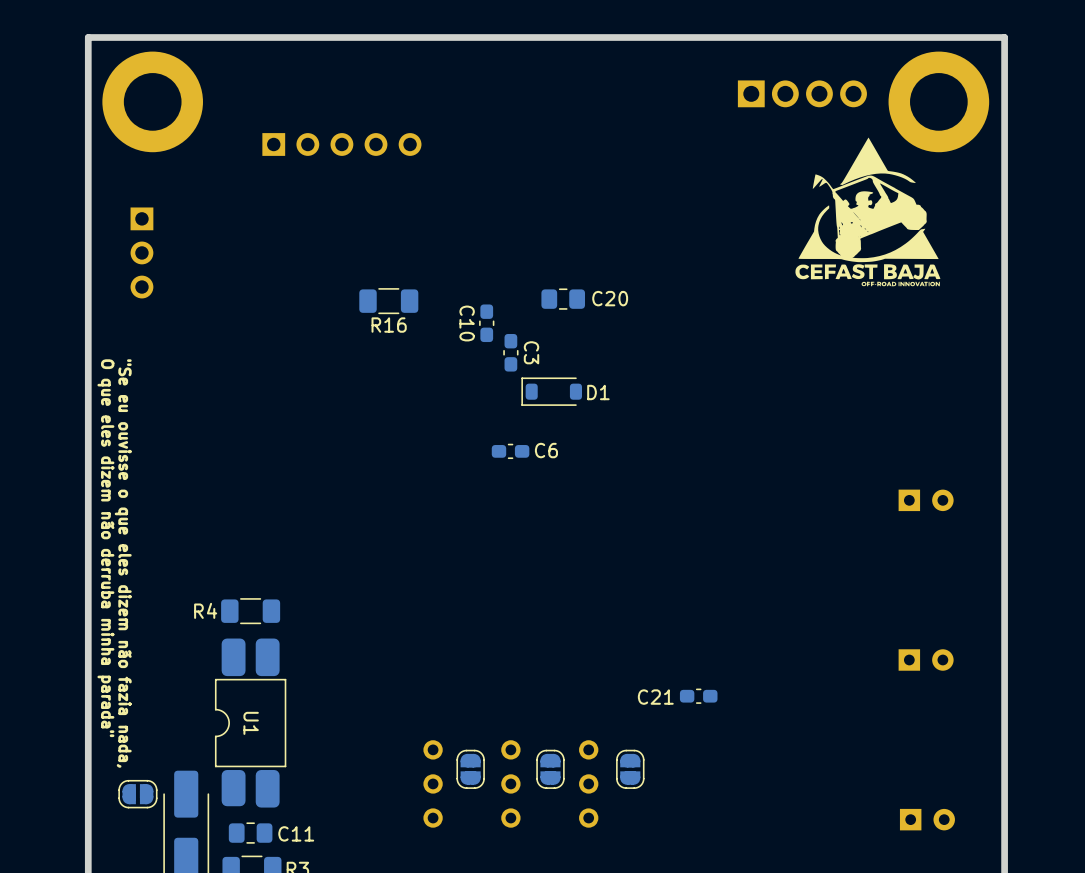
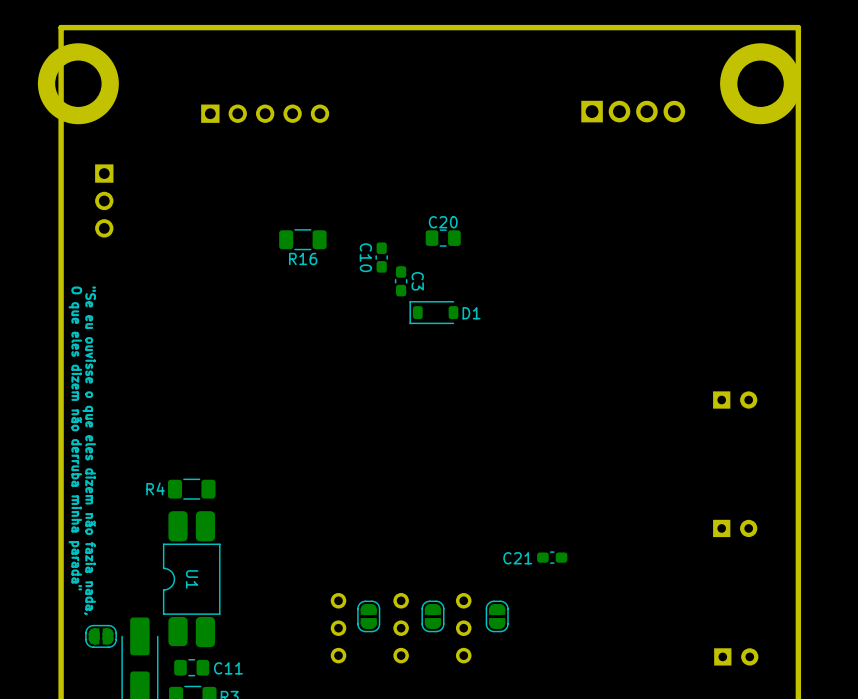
part position: (802, 93) -> (633, 111)
part position: (152, 101) -> (78, 83)
part position: (938, 101) -> (760, 83)
drawing: [795, 137, 941, 287] -> none
C20 name position: C20 (610, 298) -> C20 (443, 222)
C6: (510, 451) -> none

